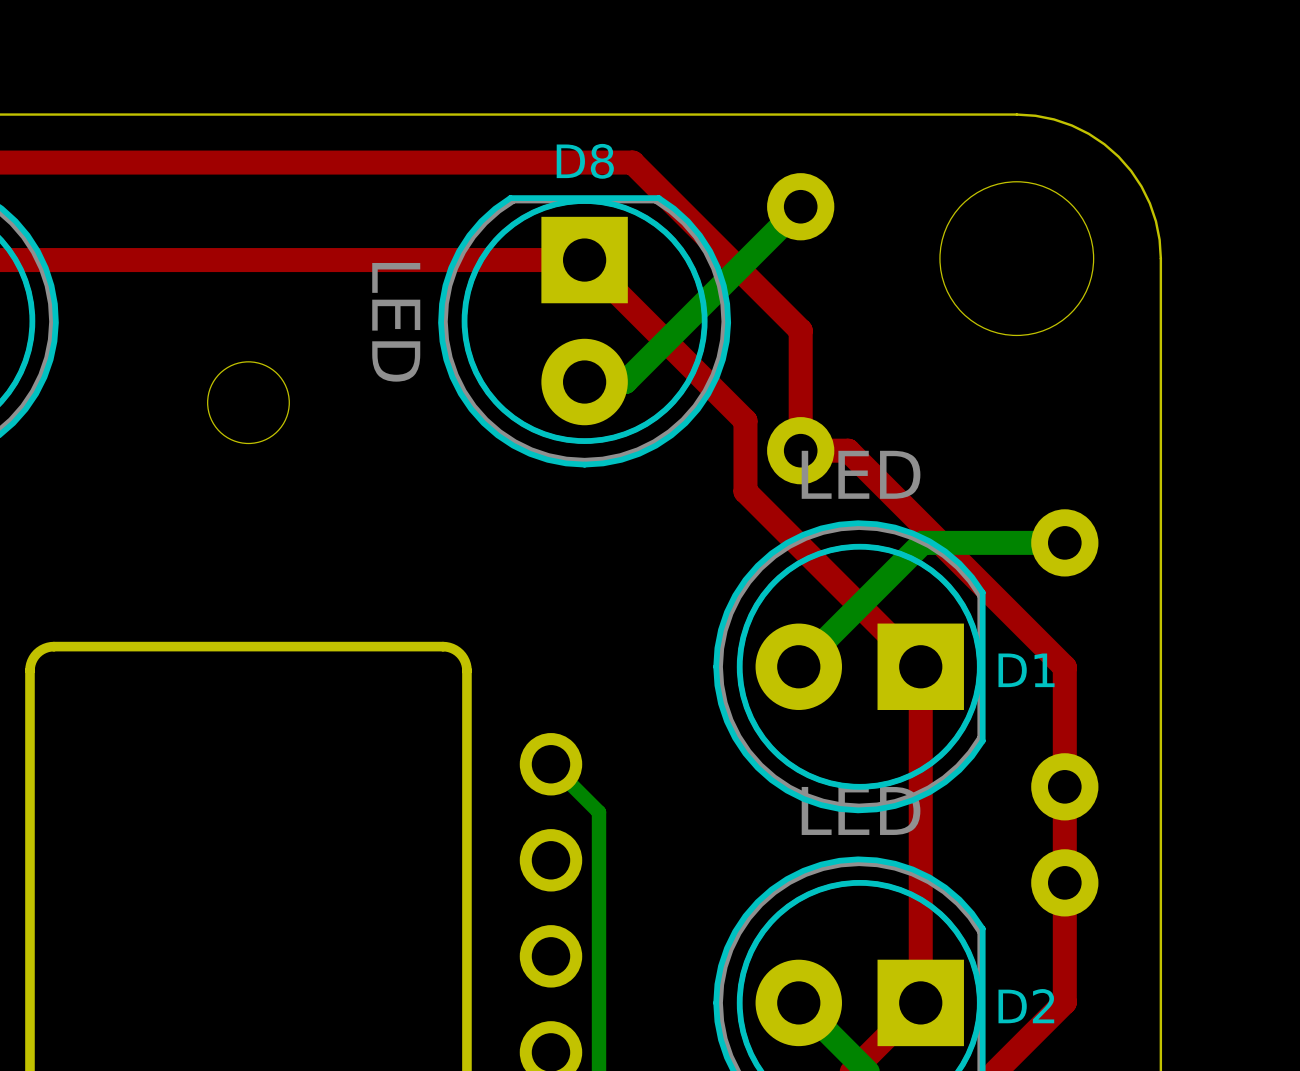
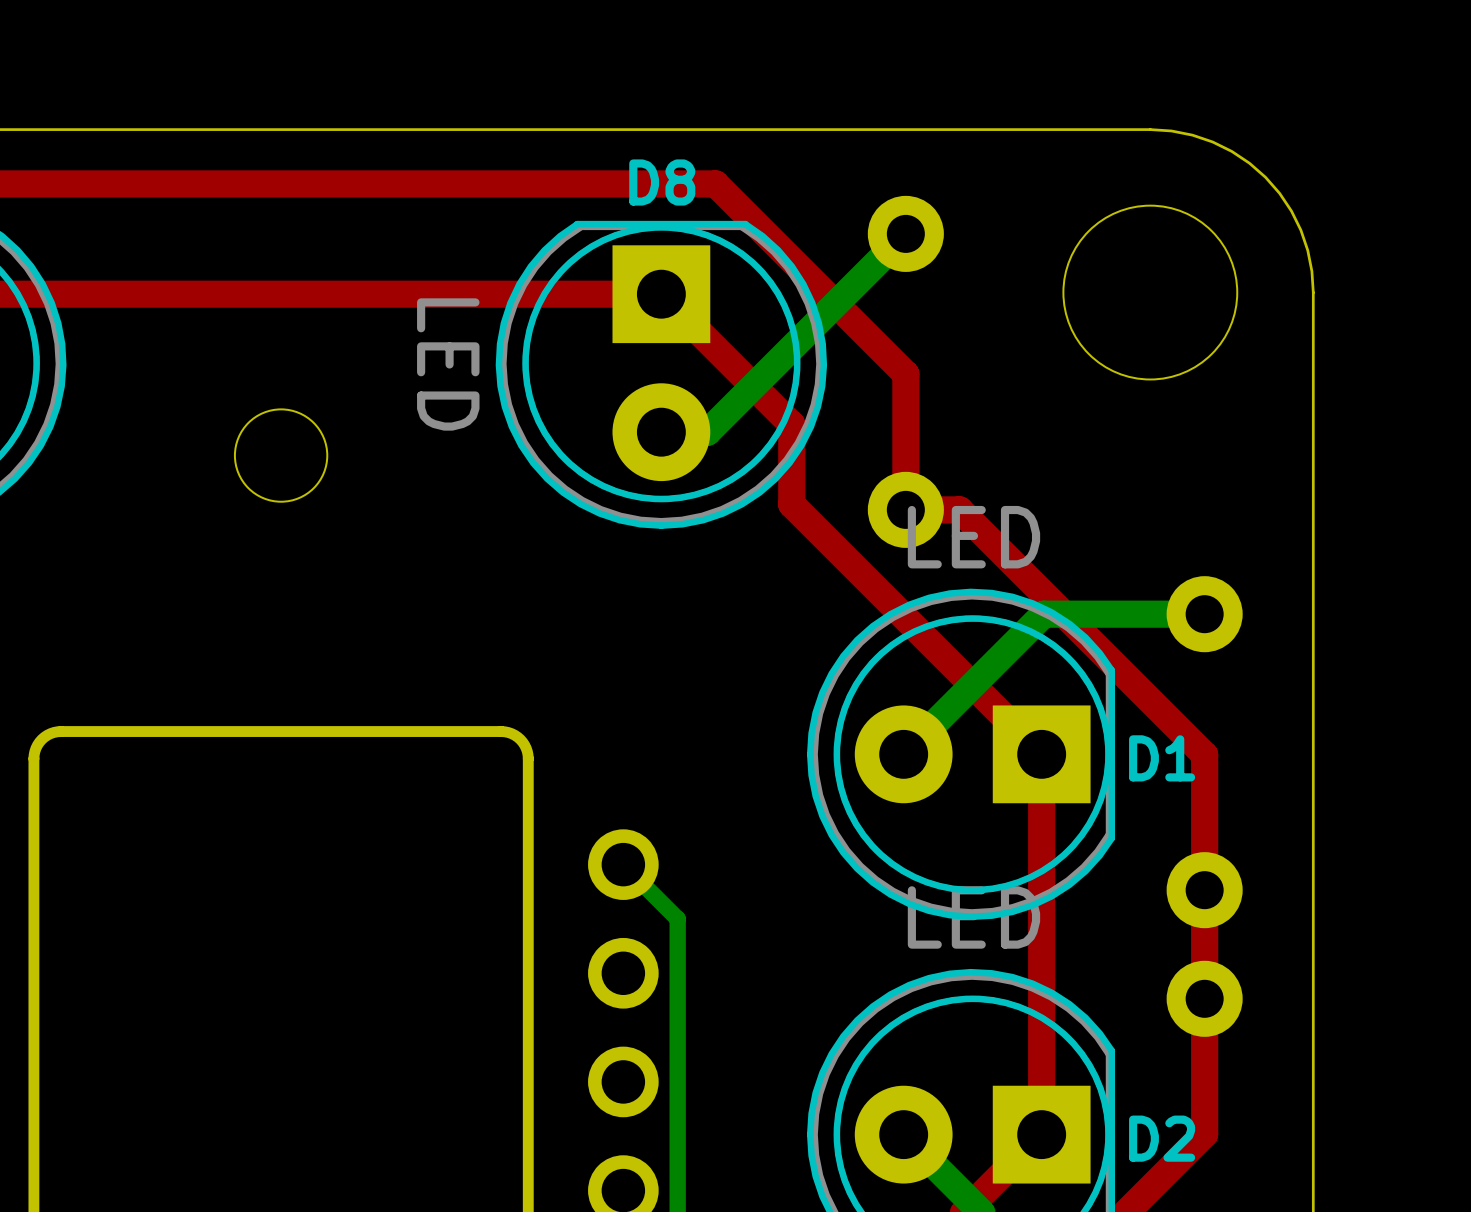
top track: (699, 375) (745, 420) (745, 491) -> (791, 424) (791, 504) (843, 556)

